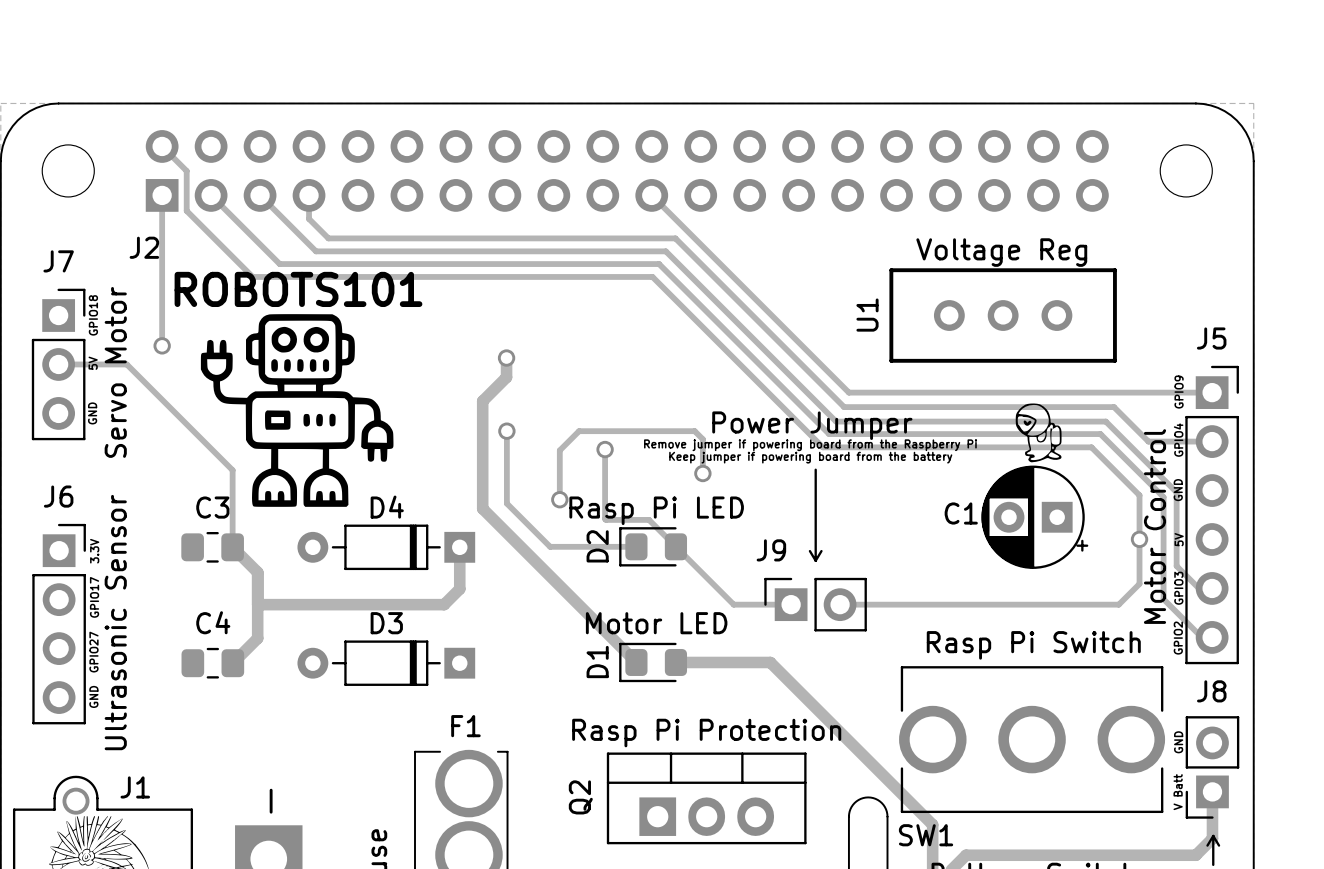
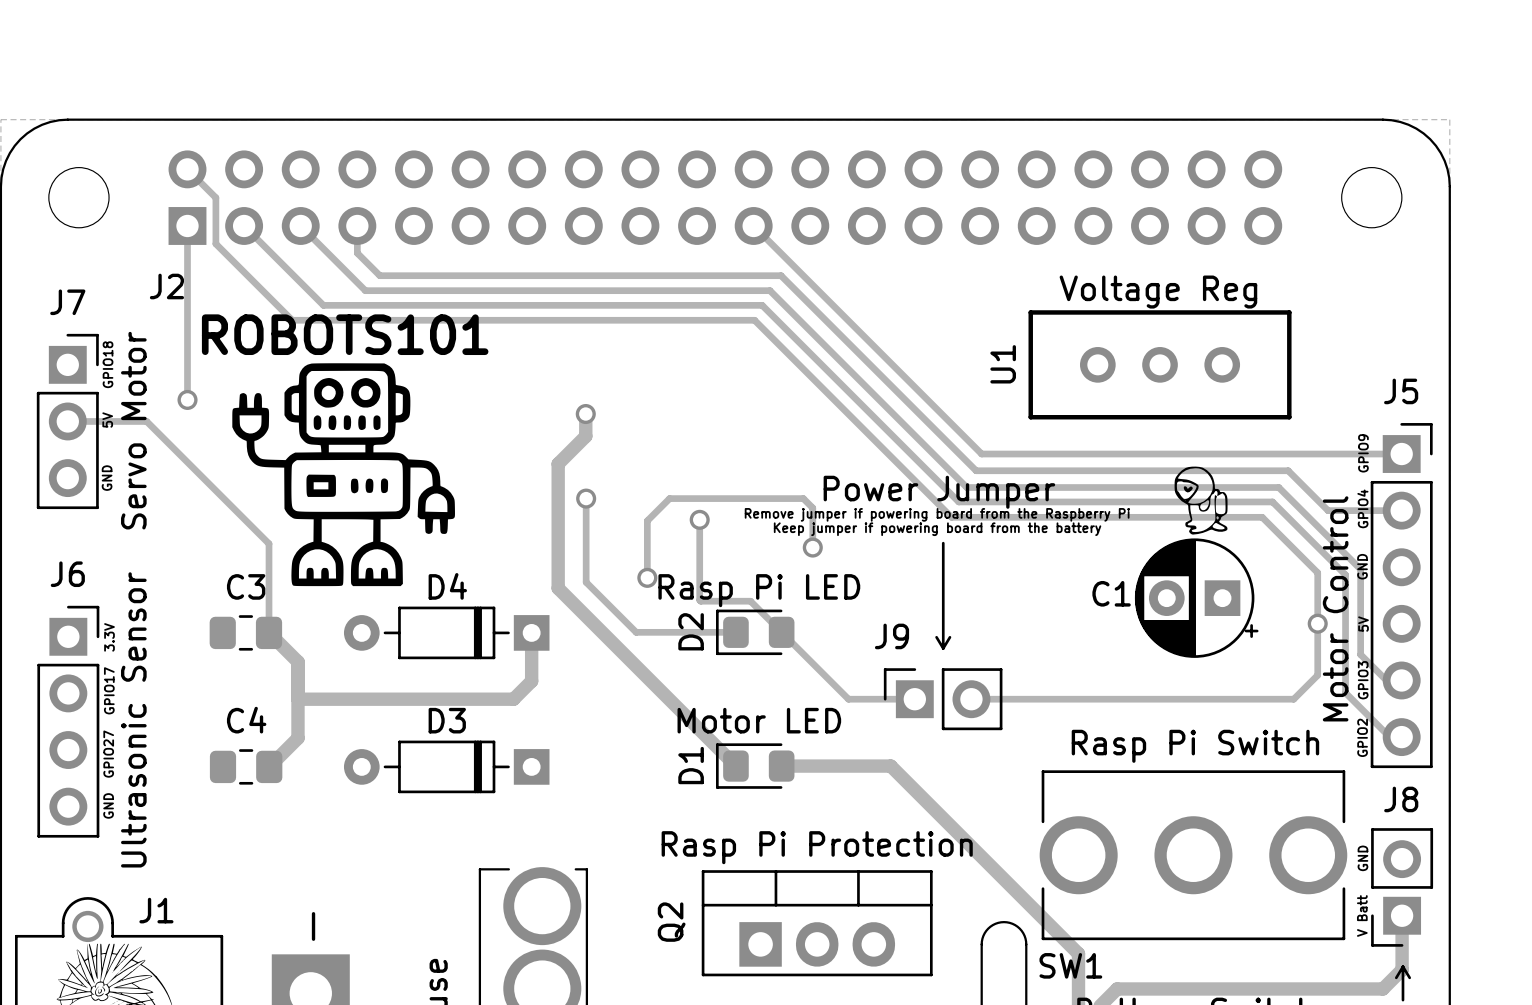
text: F1 (465, 726) -> none

